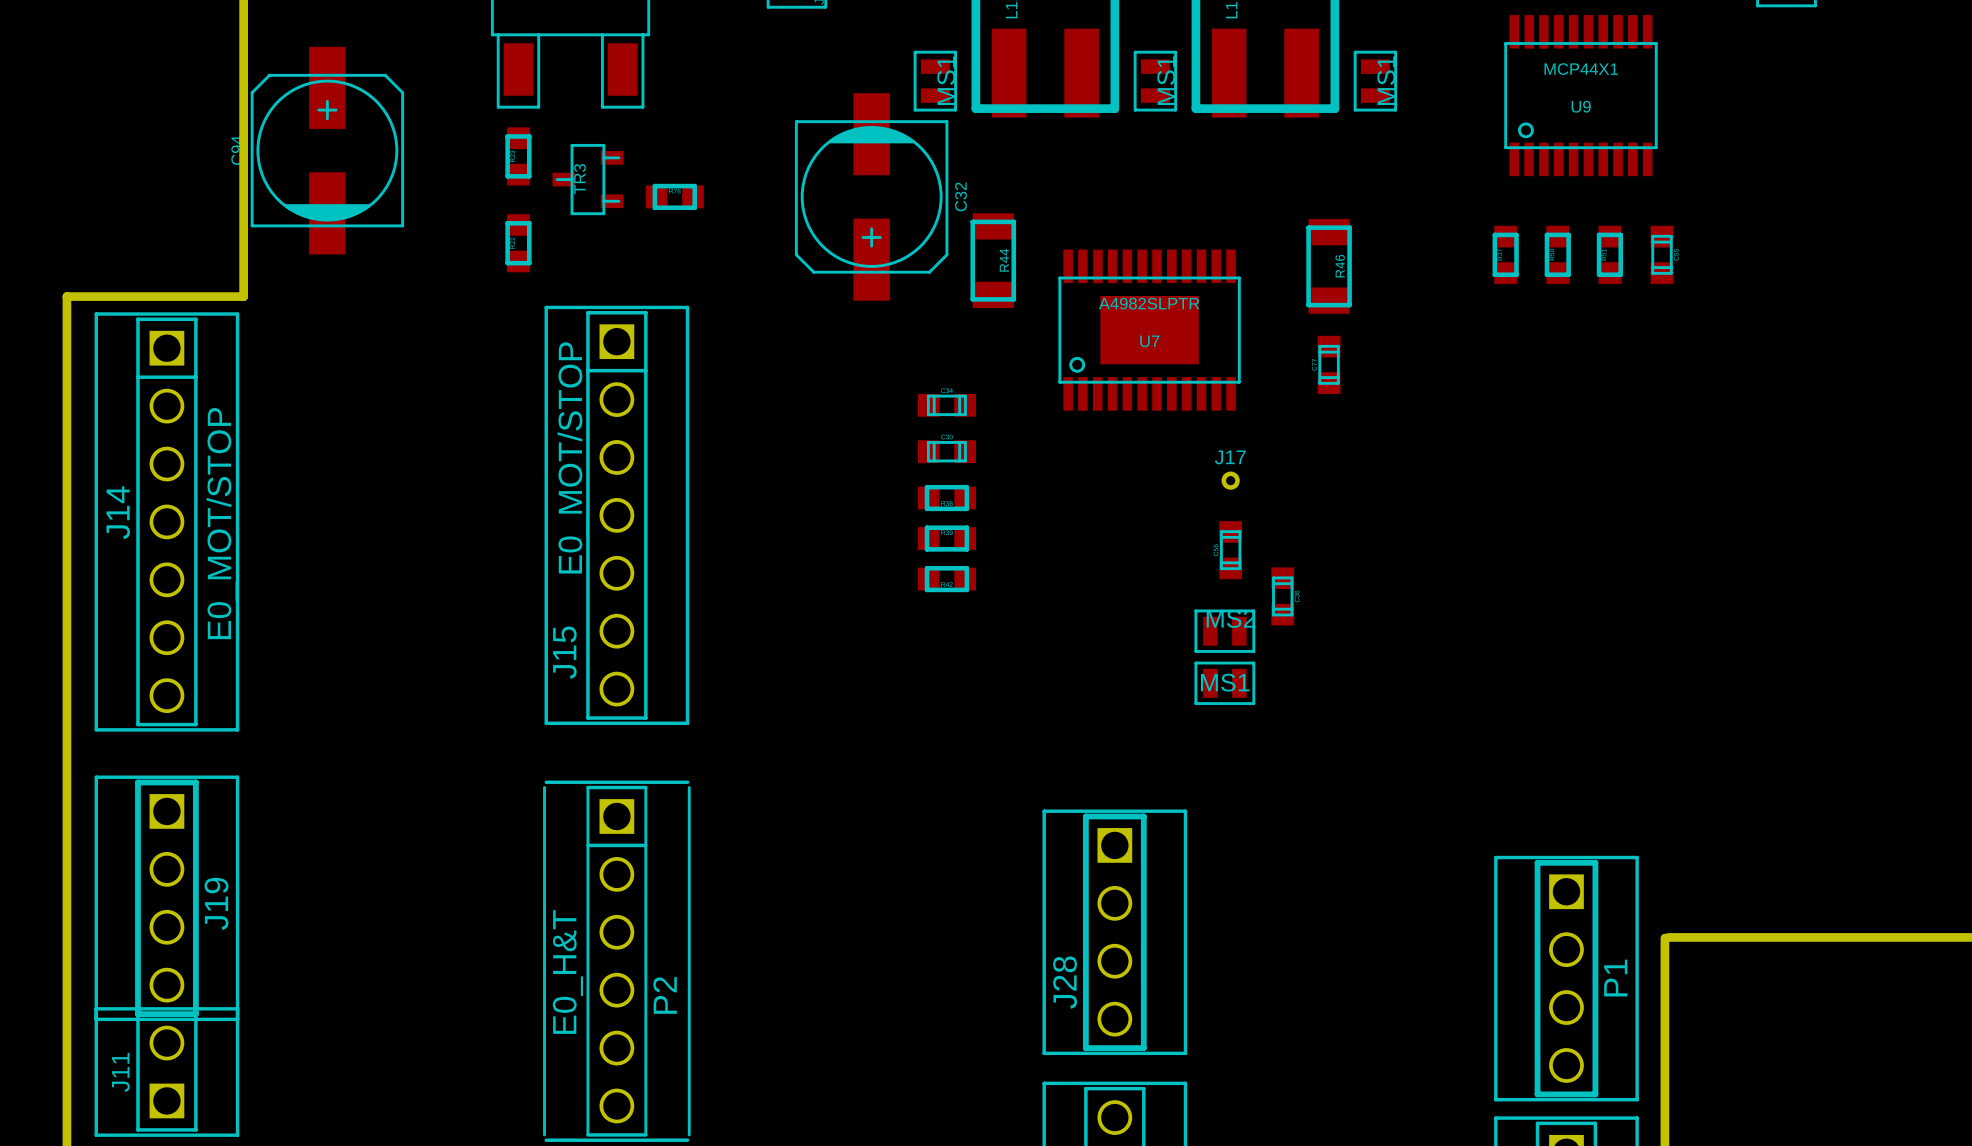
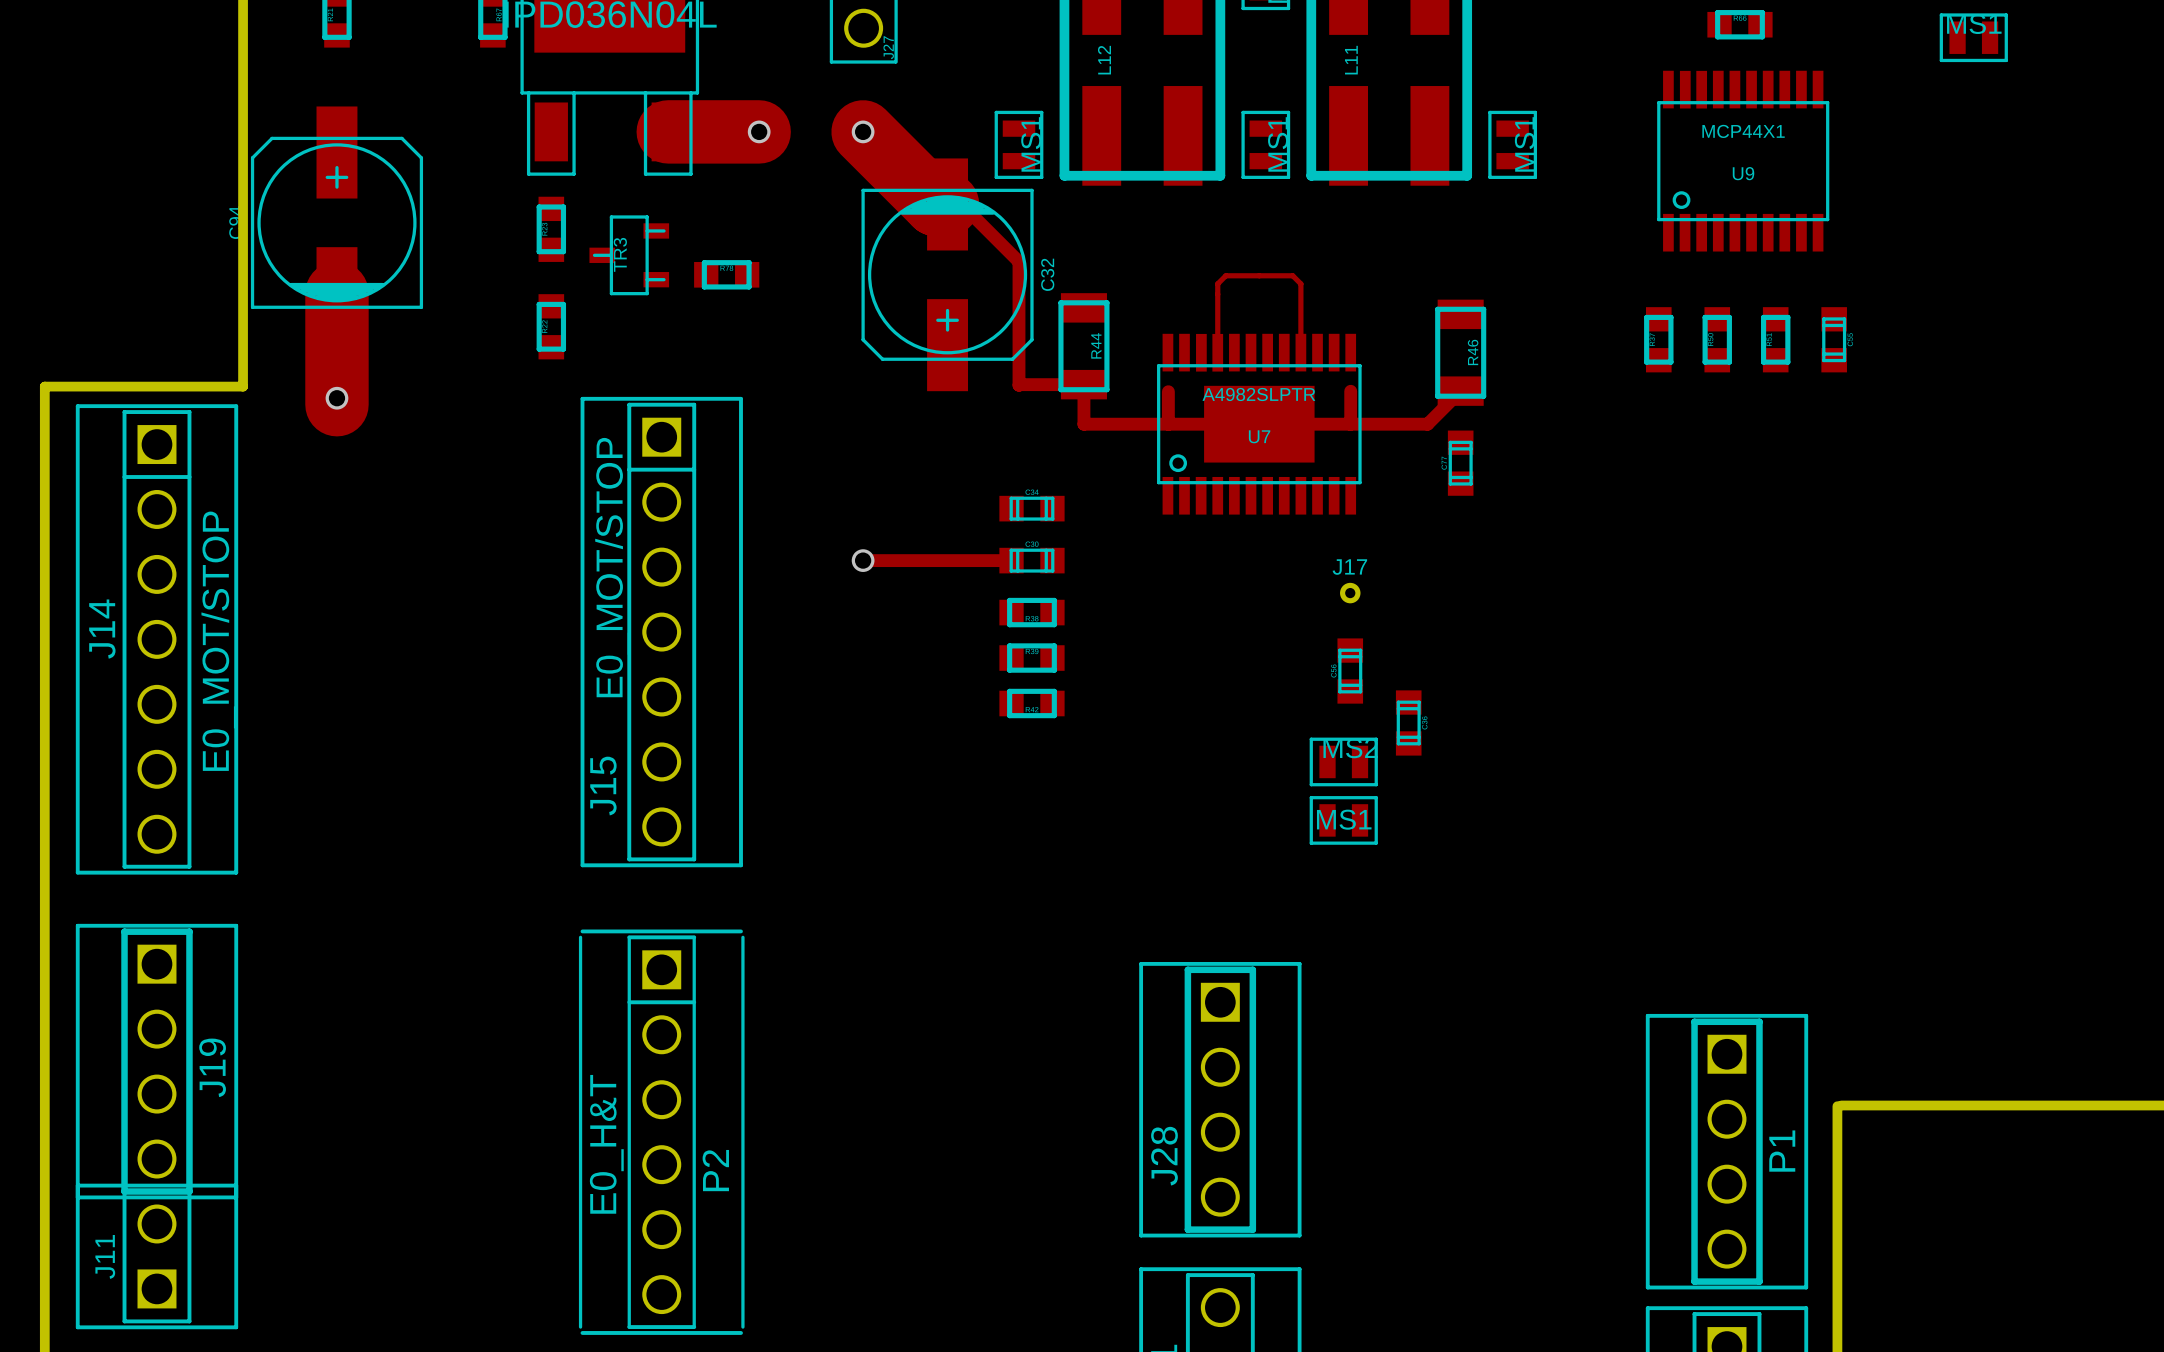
track: none -> (668, 131) (759, 131)
via: none -> (759, 131)
track: none -> (863, 131) (935, 204) (961, 204) (1018, 261) (1018, 385) (1083, 384) (1083, 424) (1427, 424) (1460, 391)
via: none -> (863, 131)
track: none -> (336, 293) (336, 404) (336, 398)
track: none -> (1300, 352) (1300, 283) (1292, 275) (1225, 275) (1217, 283) (1217, 352)
track: none -> (1167, 391) (1168, 424)
track: none -> (1350, 391) (1350, 424)
via: none -> (336, 398)
track: none -> (863, 560) (1011, 560)
via: none -> (863, 560)

